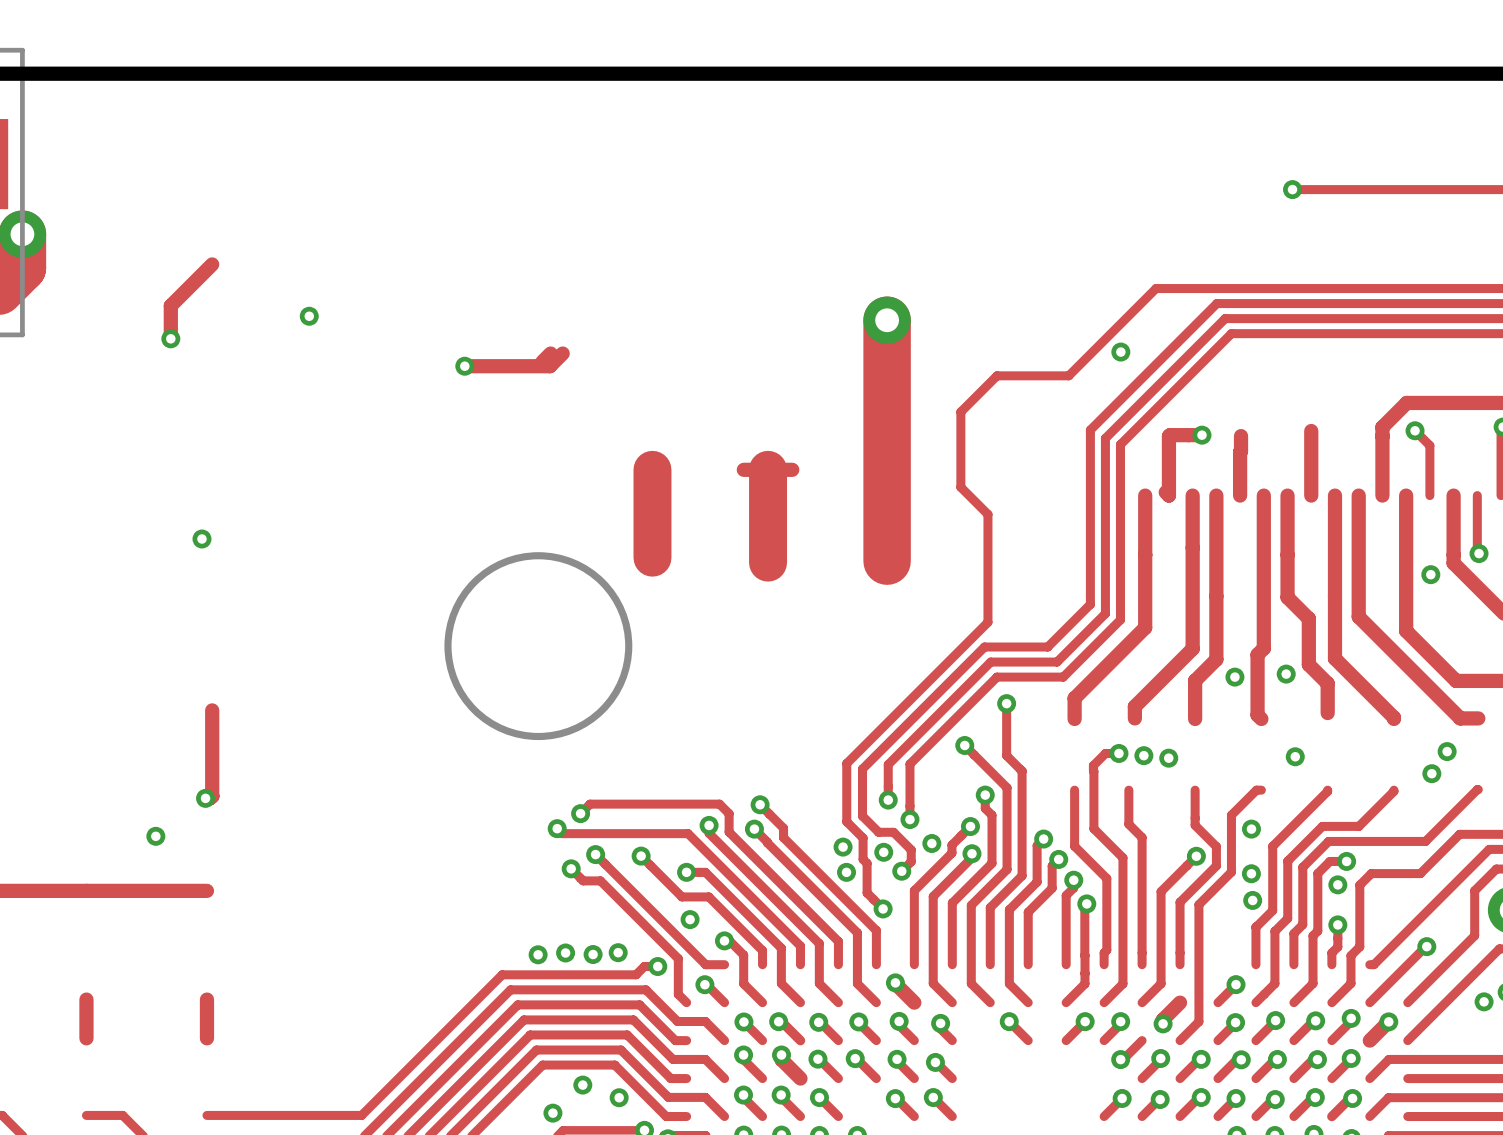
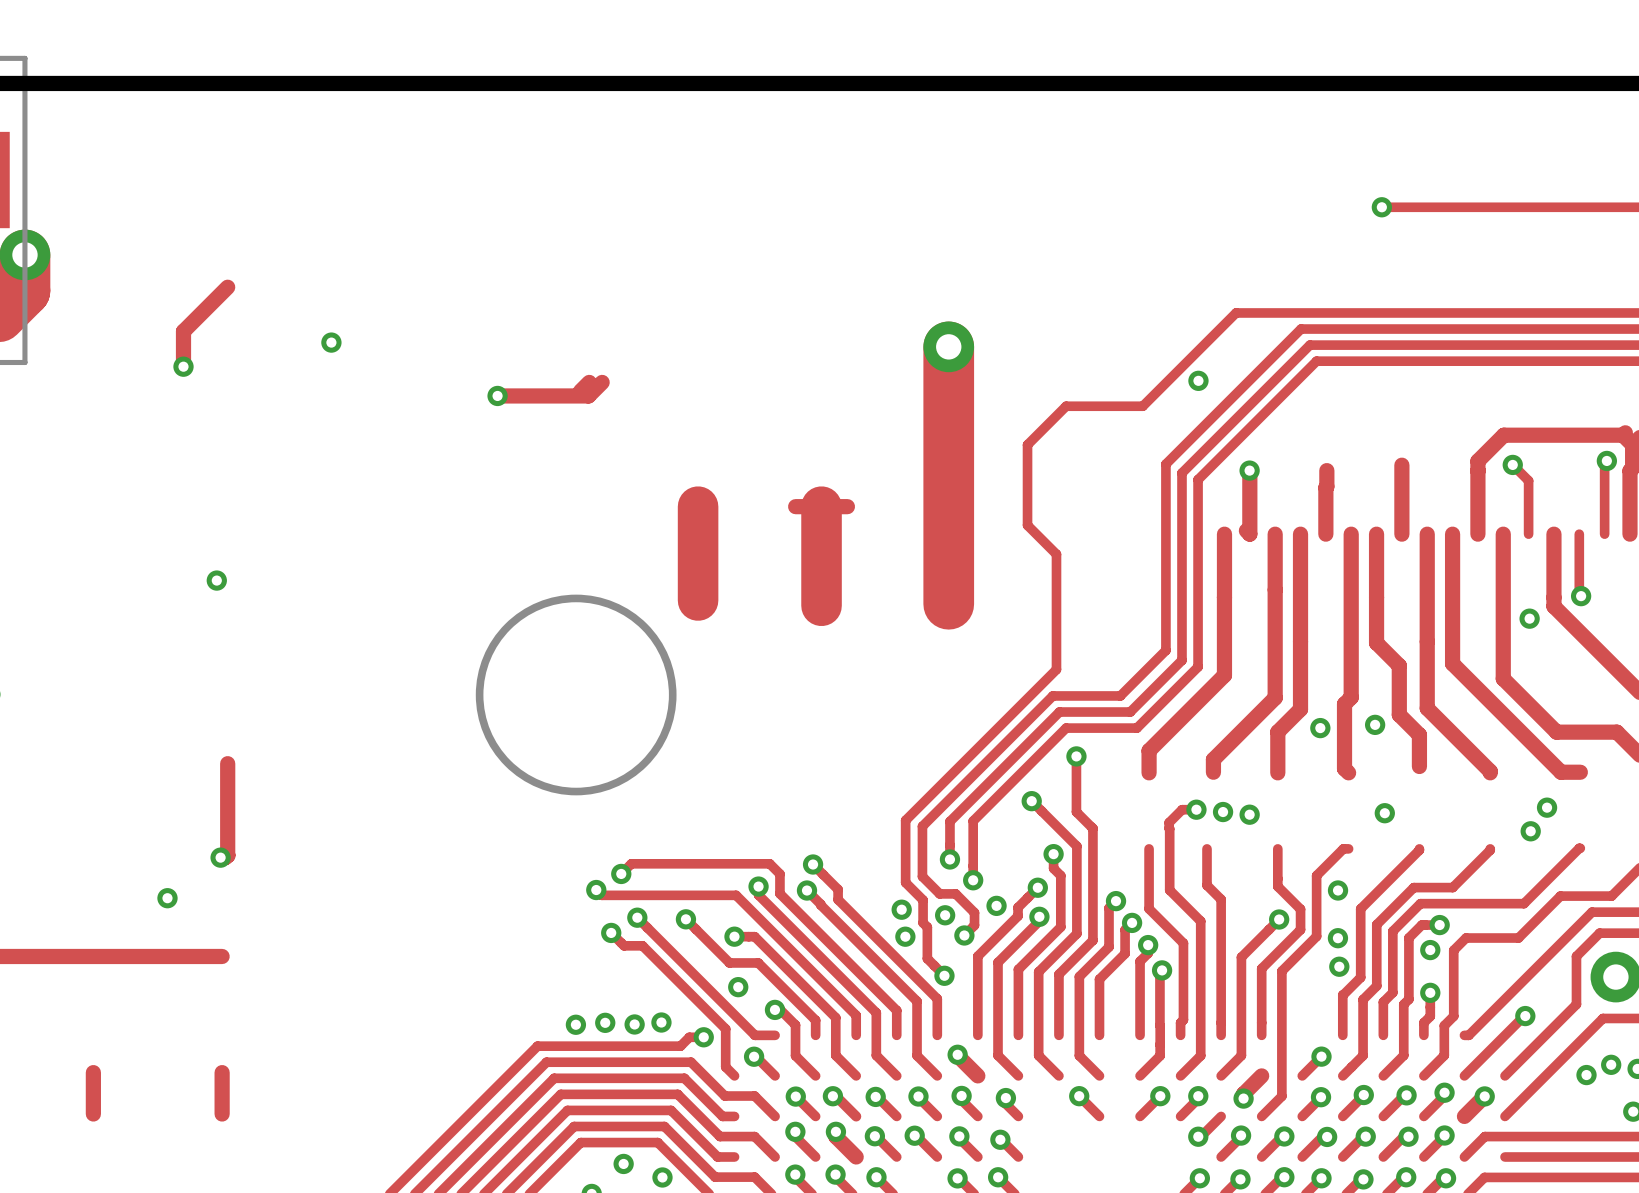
track: (1202, 435) (1168, 436) -> none
via position: (1202, 435) -> (1249, 470)

